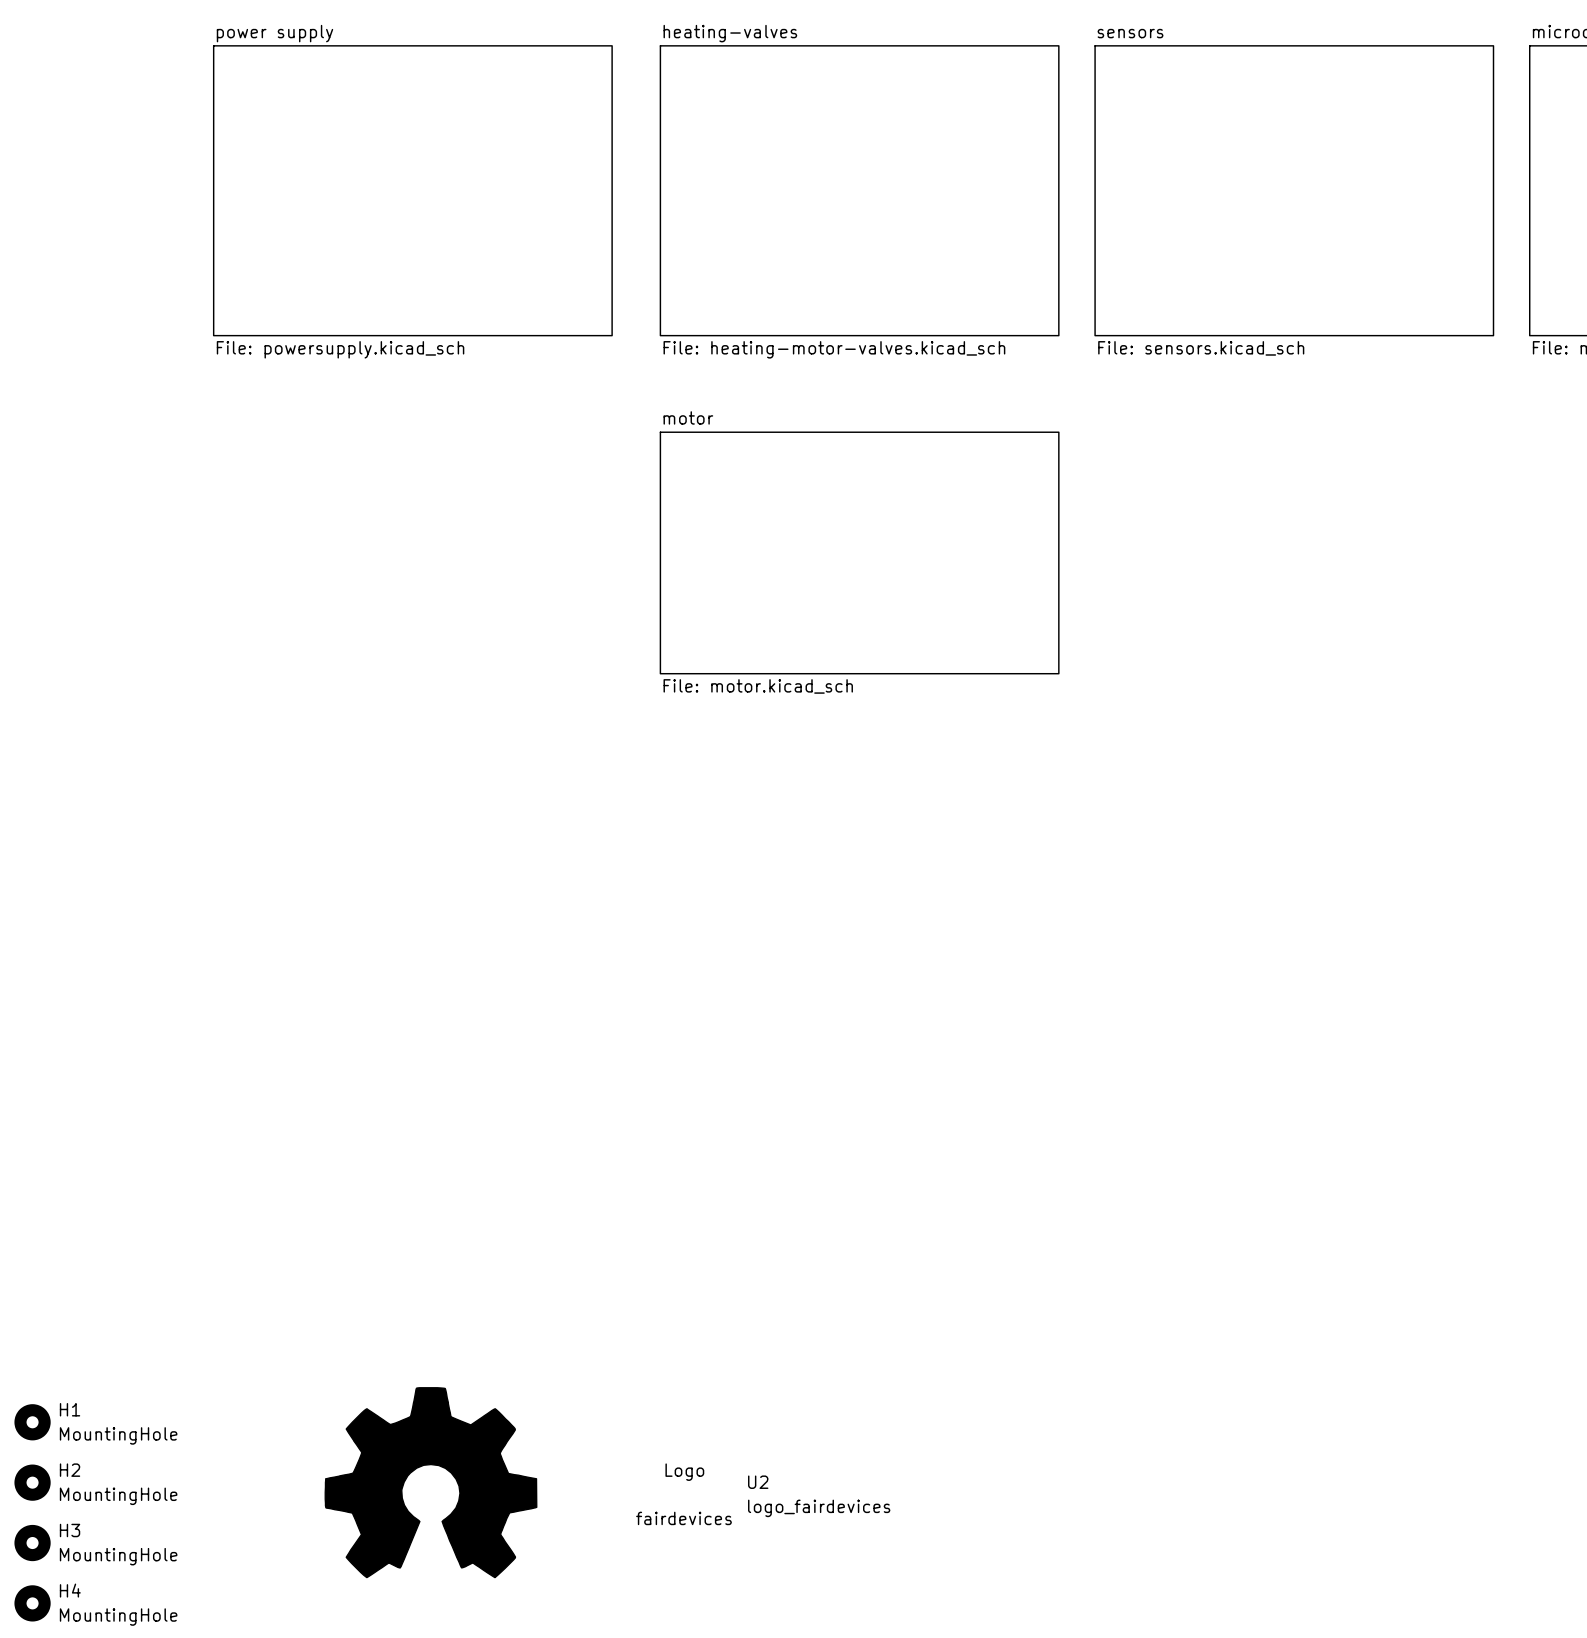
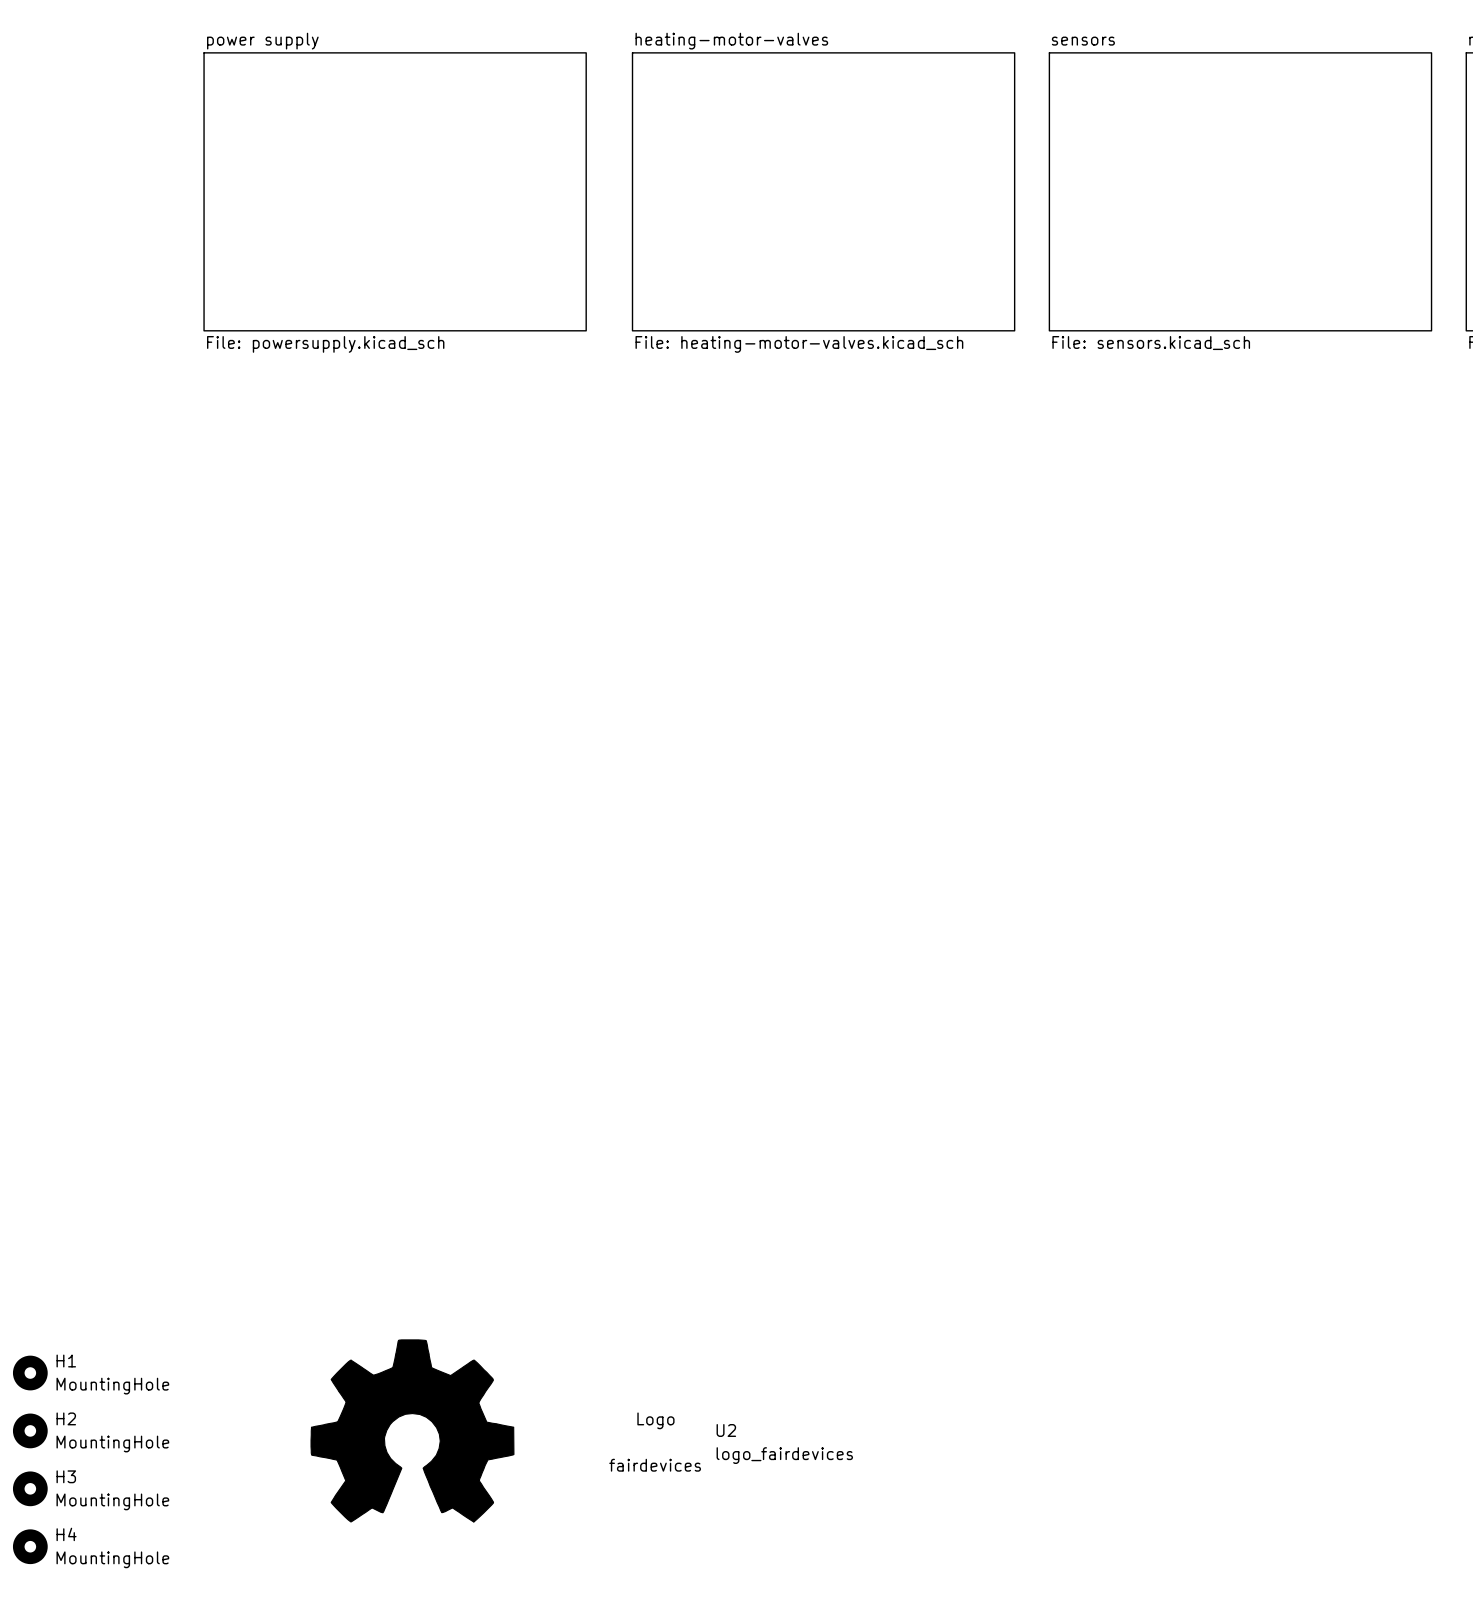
sheet heating-valves name: heating-valves (730, 33) -> heating-motor-valves (731, 41)
sheet motor: File: motor.kicad_sch (859, 552) -> none

